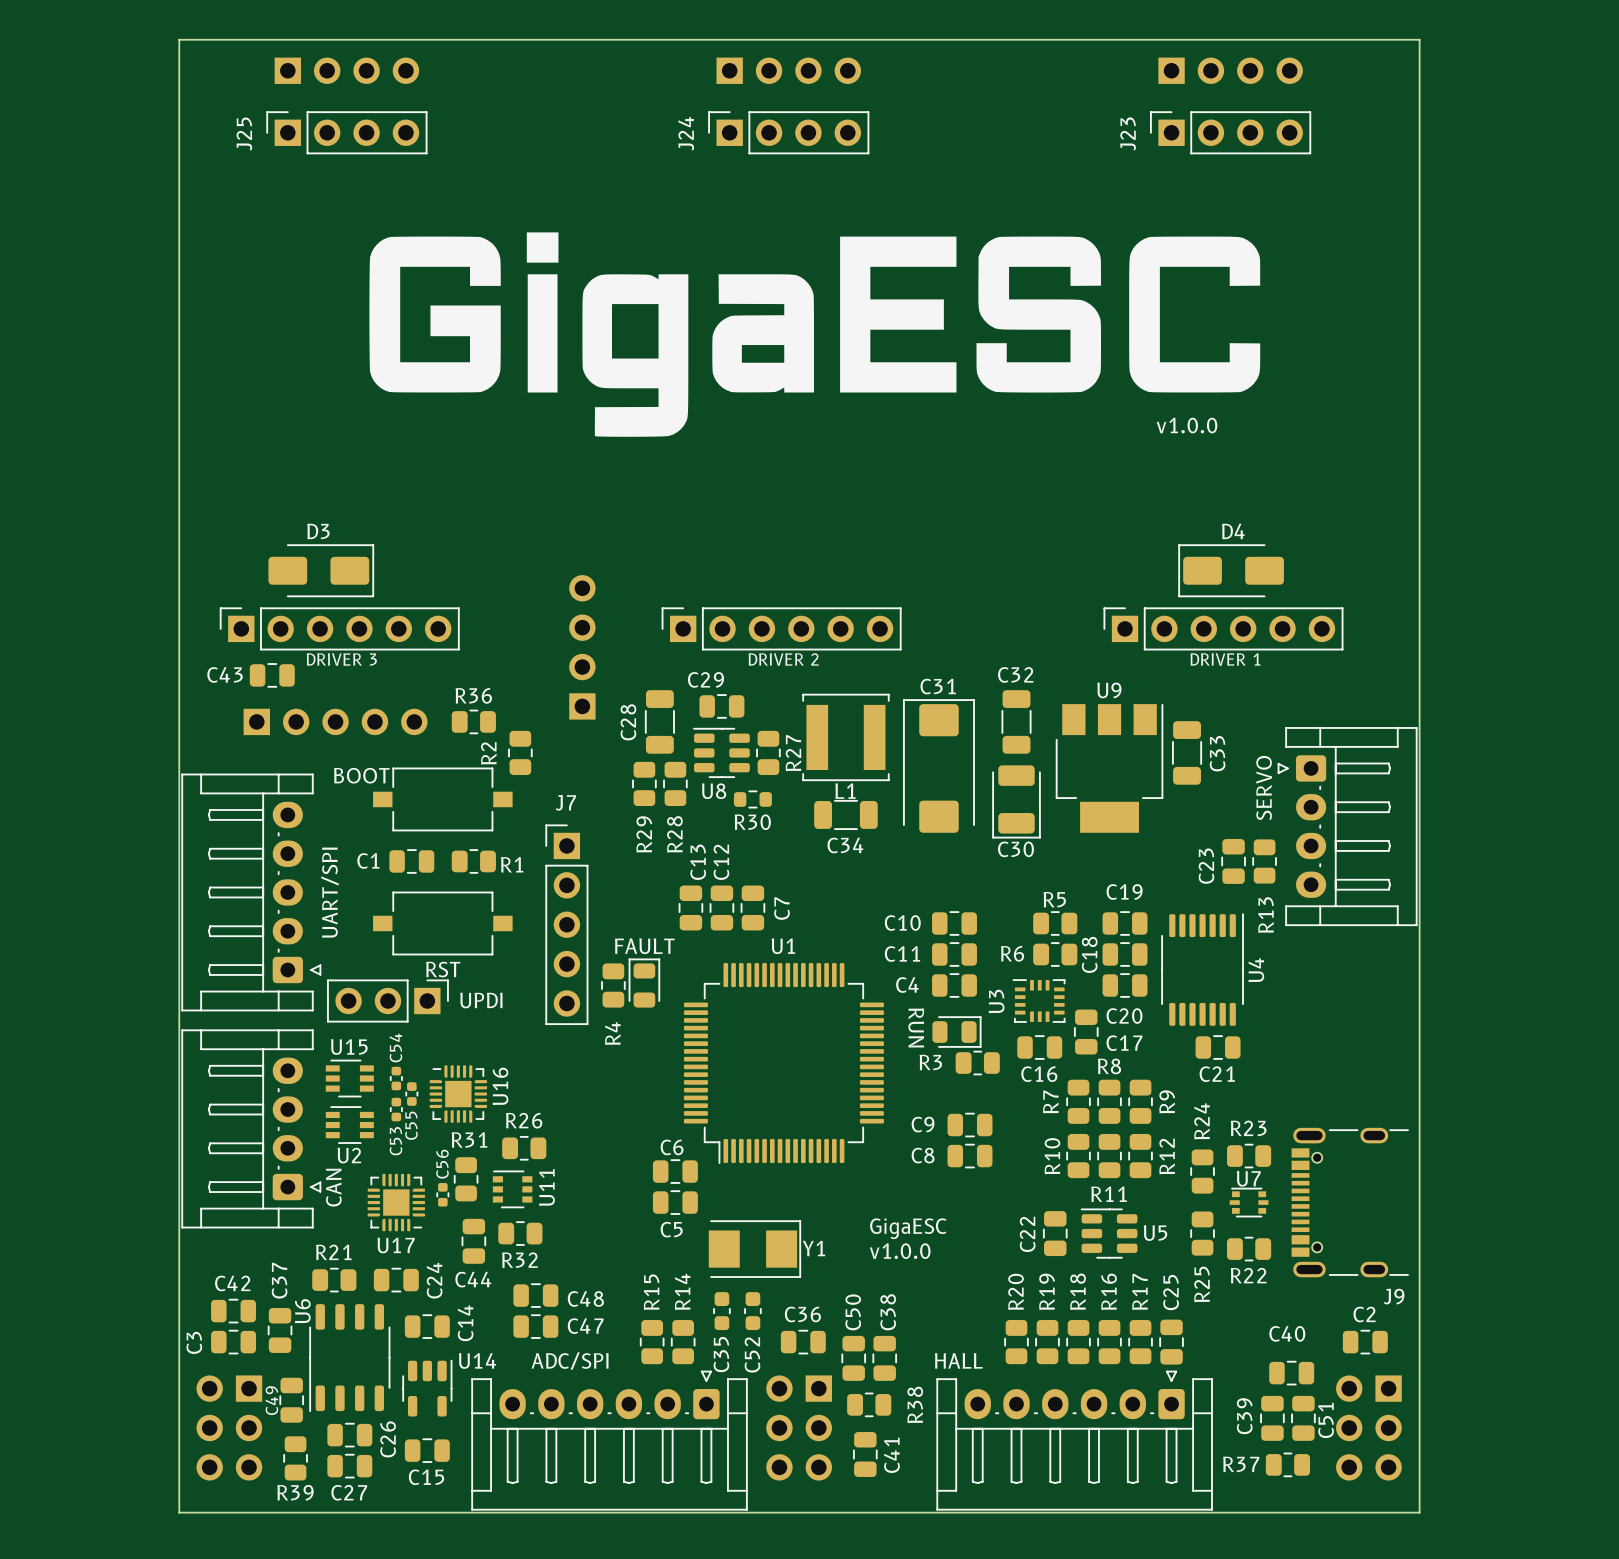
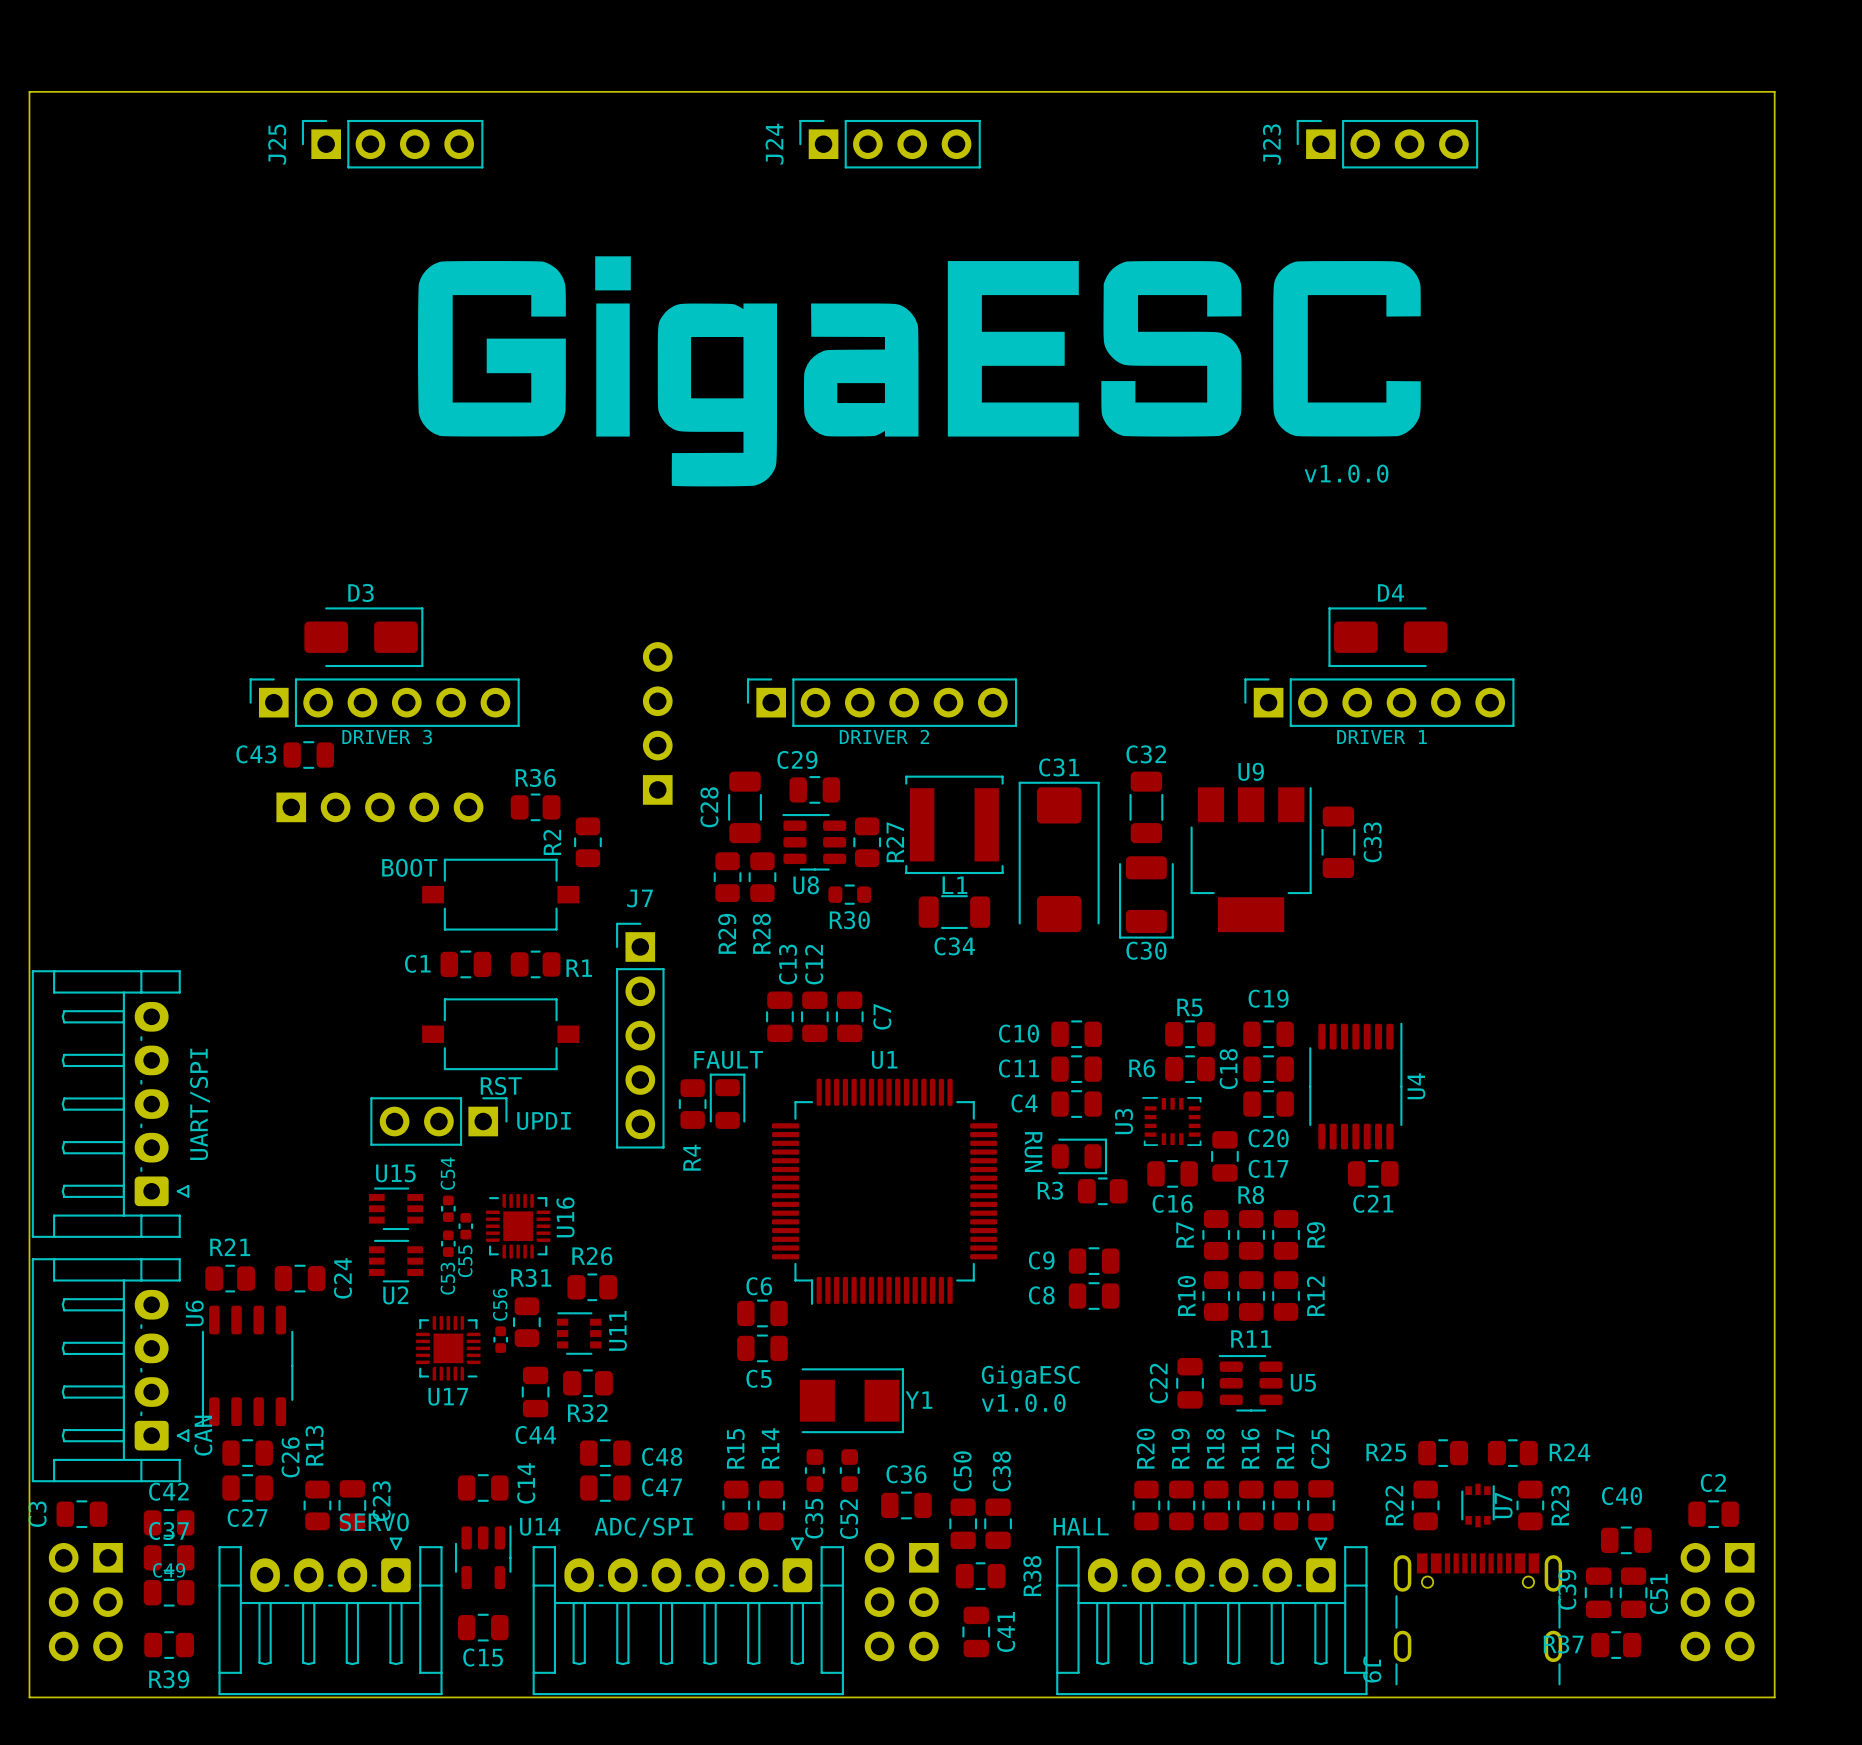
part: (346, 70) -> none
part: (788, 70) -> none
part: (1230, 70) -> none
part: (1347, 826) -> none
C23 position: (1233, 861) -> (352, 1505)
R13 position: (1264, 861) -> (317, 1505)
C23 name position: C23 (1206, 866) -> C23 (381, 1501)
part position: (251, 892) -> (110, 1104)
R13 name position: R13 (1265, 915) -> R13 (314, 1445)
part position: (251, 1128) -> (110, 1370)
R23 rotation: 0° (1249, 1156) -> 90° clockwise (1530, 1505)
R23 position: (1249, 1156) -> (1530, 1505)
R24 rotation: 0° (1202, 1171) -> 90° clockwise (1512, 1453)
R24 position: (1202, 1171) -> (1512, 1453)
U7 rotation: 0° (1249, 1202) -> 90° clockwise (1478, 1505)
U7 position: (1249, 1202) -> (1478, 1505)
J9 rotation: 0° (1350, 1202) -> 90° clockwise (1478, 1619)
J9 position: (1350, 1202) -> (1478, 1619)
R25 rotation: 0° (1202, 1233) -> 90° clockwise (1443, 1453)
R25 position: (1202, 1233) -> (1443, 1453)
R22 rotation: 0° (1249, 1249) -> 90° clockwise (1425, 1505)
R22 position: (1249, 1249) -> (1425, 1505)
R21 position: (334, 1280) -> (230, 1278)
C24 position: (396, 1280) -> (299, 1278)
C42 position: (233, 1311) -> (169, 1522)
C37 rotation: 0° (280, 1330) -> 90° clockwise (169, 1557)
C37 position: (280, 1330) -> (169, 1557)
C3 position: (233, 1342) -> (81, 1514)
C2 position: (1365, 1342) -> (1713, 1514)
U6 position: (349, 1358) -> (247, 1366)
C40 position: (1291, 1373) -> (1626, 1540)
C49 rotation: 0° (291, 1400) -> 90° clockwise (169, 1592)
C49 position: (291, 1400) -> (169, 1592)
C39 position: (1272, 1418) -> (1598, 1592)
C51 position: (1303, 1418) -> (1633, 1592)
part position: (229, 1427) -> (85, 1602)
part position: (1368, 1427) -> (1717, 1602)
C26 position: (349, 1435) -> (247, 1453)
part: none -> (330, 1616)
R39 rotation: 0° (295, 1458) -> 90° clockwise (169, 1645)
R39 position: (295, 1458) -> (169, 1645)
R37 position: (1287, 1464) -> (1616, 1645)
C27 position: (349, 1466) -> (247, 1488)
board edge: (179, 1512) (179, 39) (1419, 39) (1419, 1512) -> (204, 1697) (29, 1697) (29, 91) (1774, 91) (1774, 1697) (1600, 1697)

